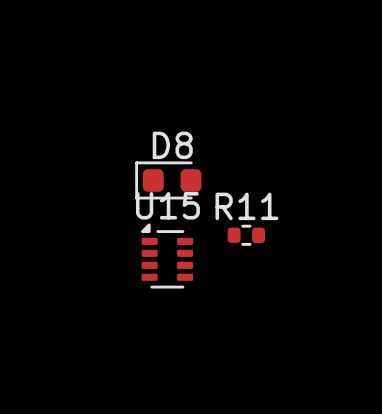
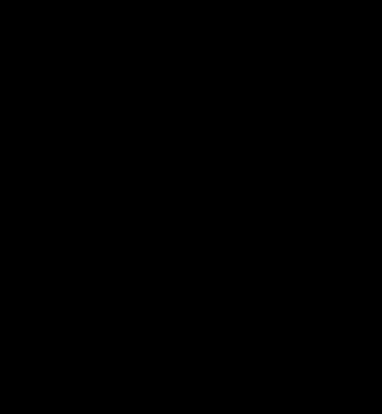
D8: (168, 180) -> none
R11: (246, 235) -> none
U15: (167, 255) -> none

